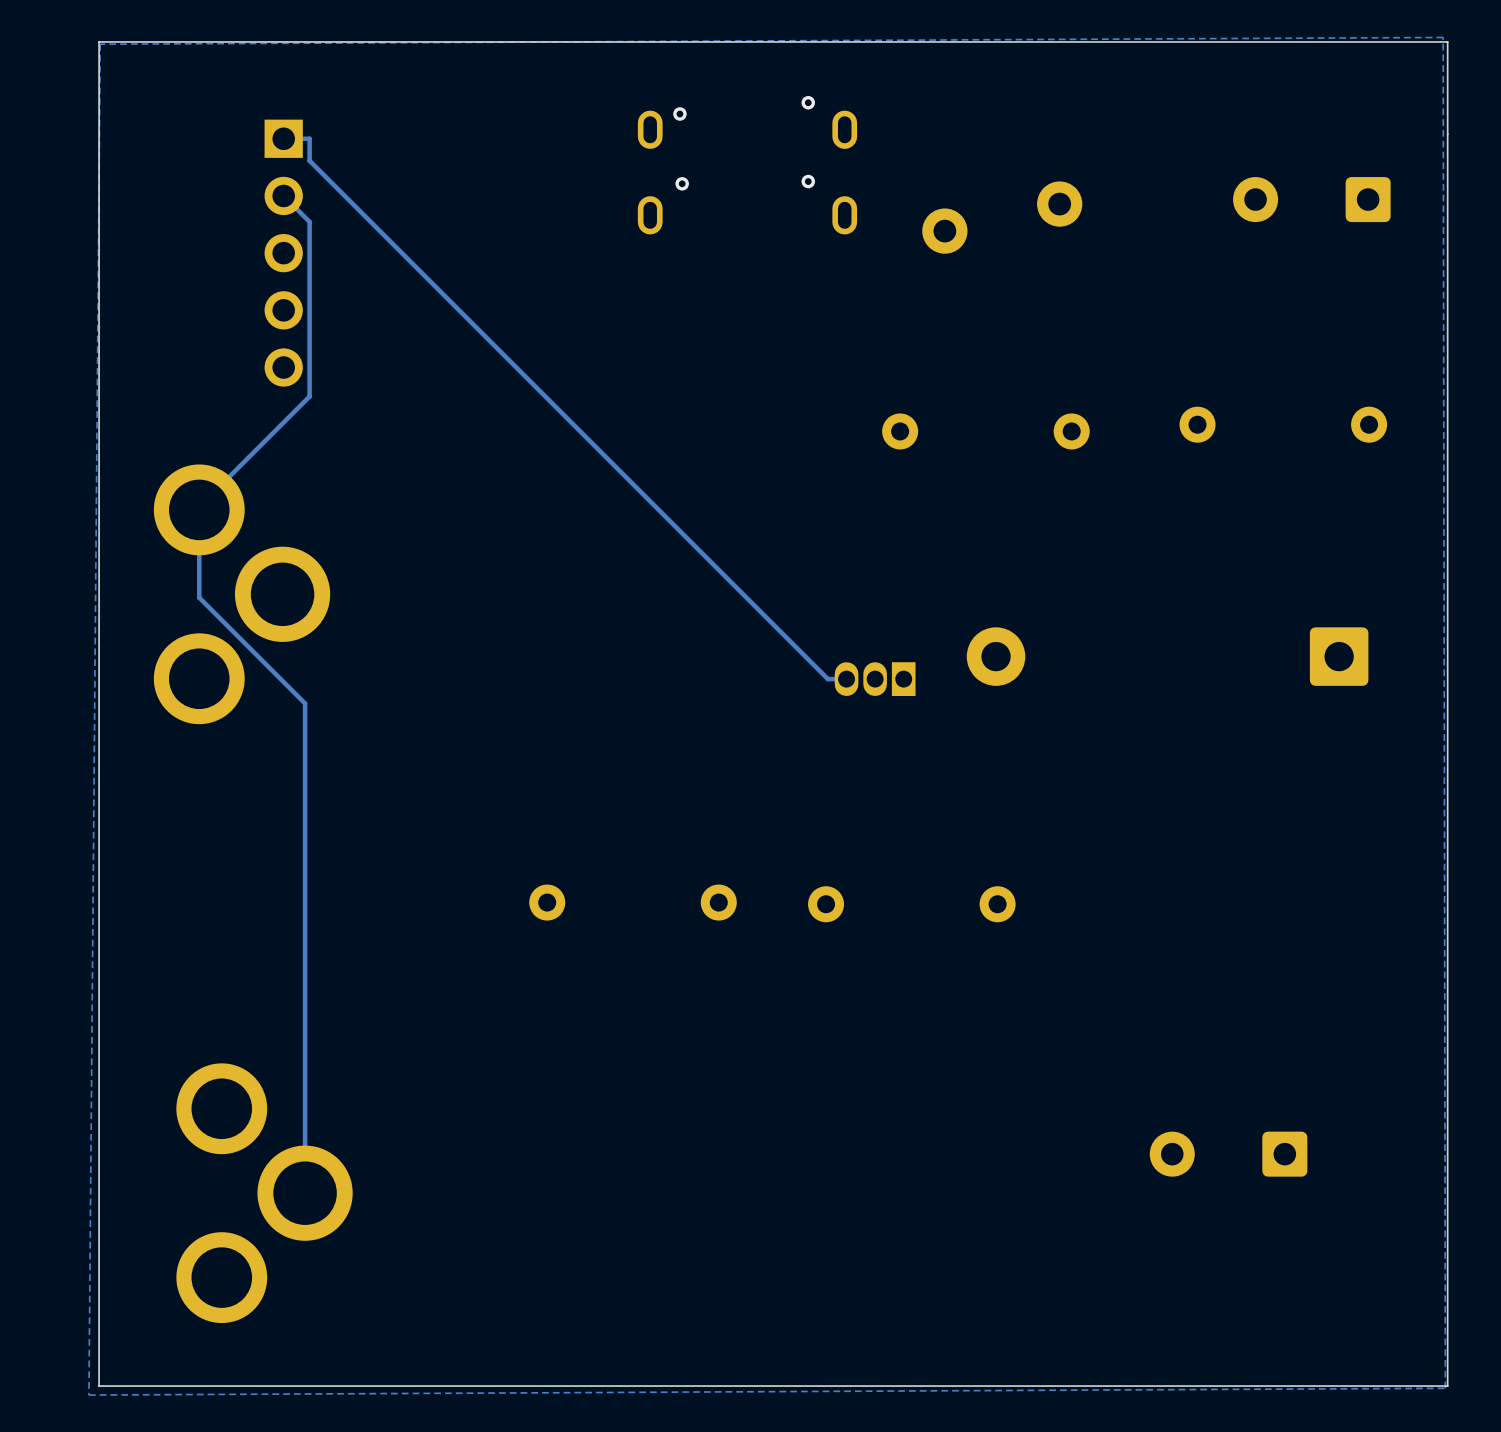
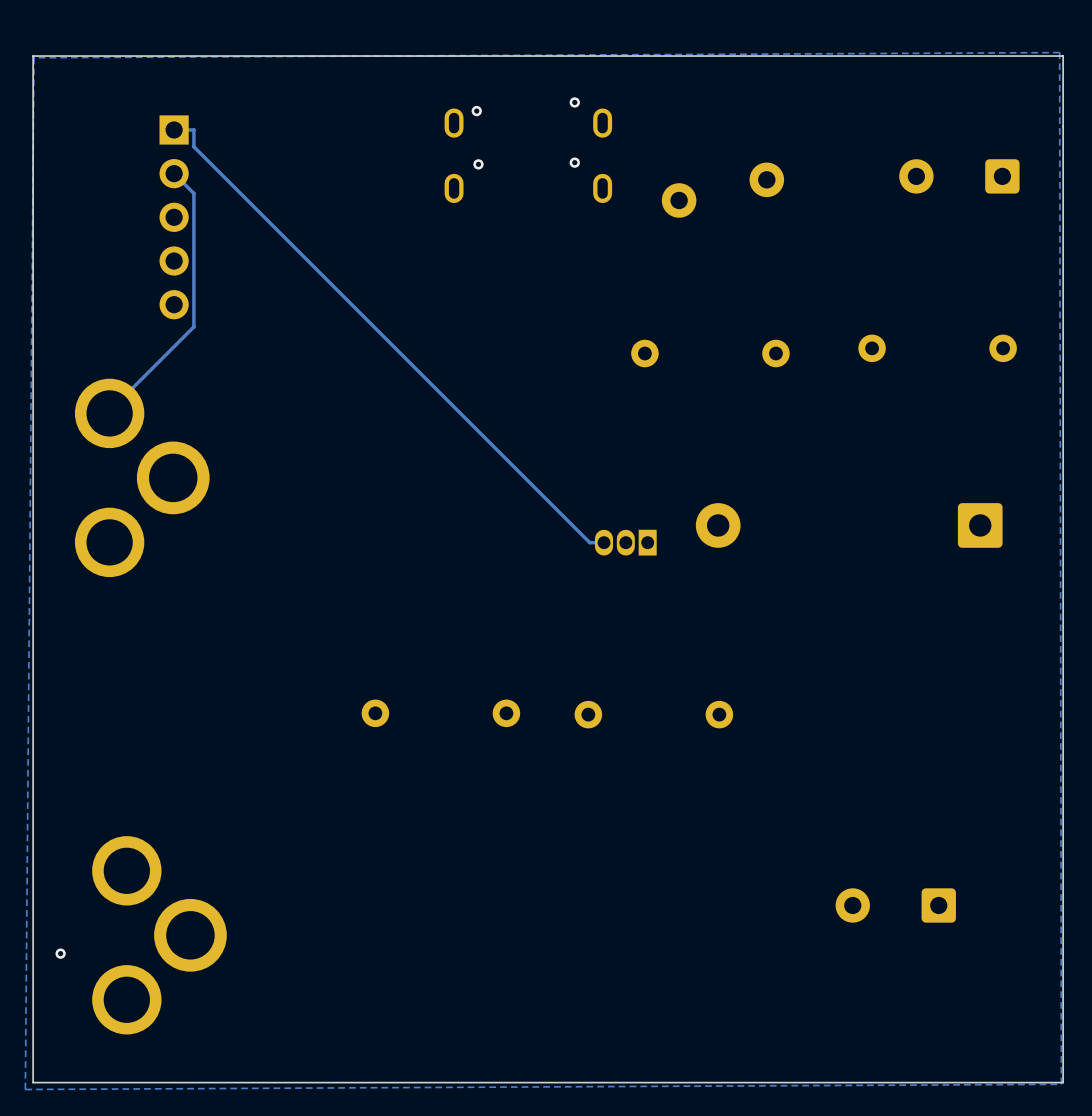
track: (228, 477) (228, 480) (199, 509) (199, 597) (305, 703) (305, 1188) -> none
via: none -> (60, 953)

